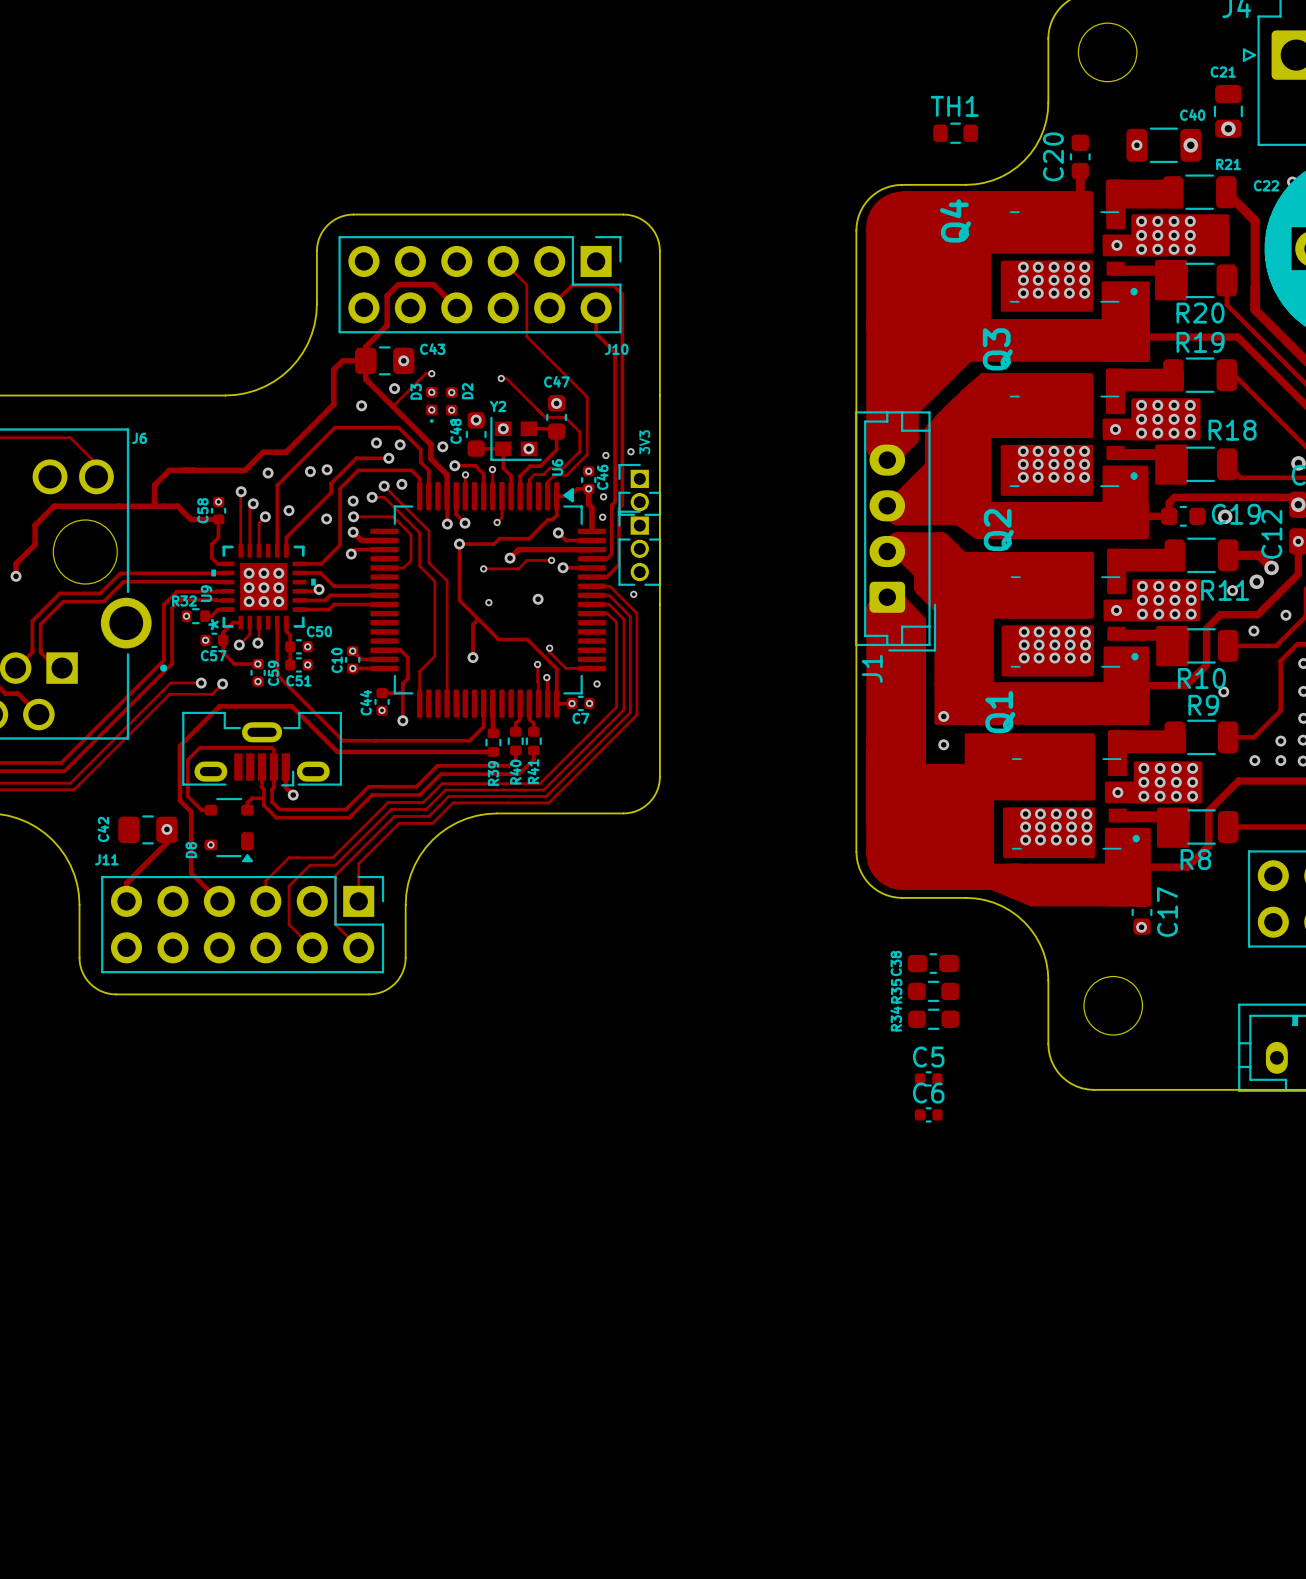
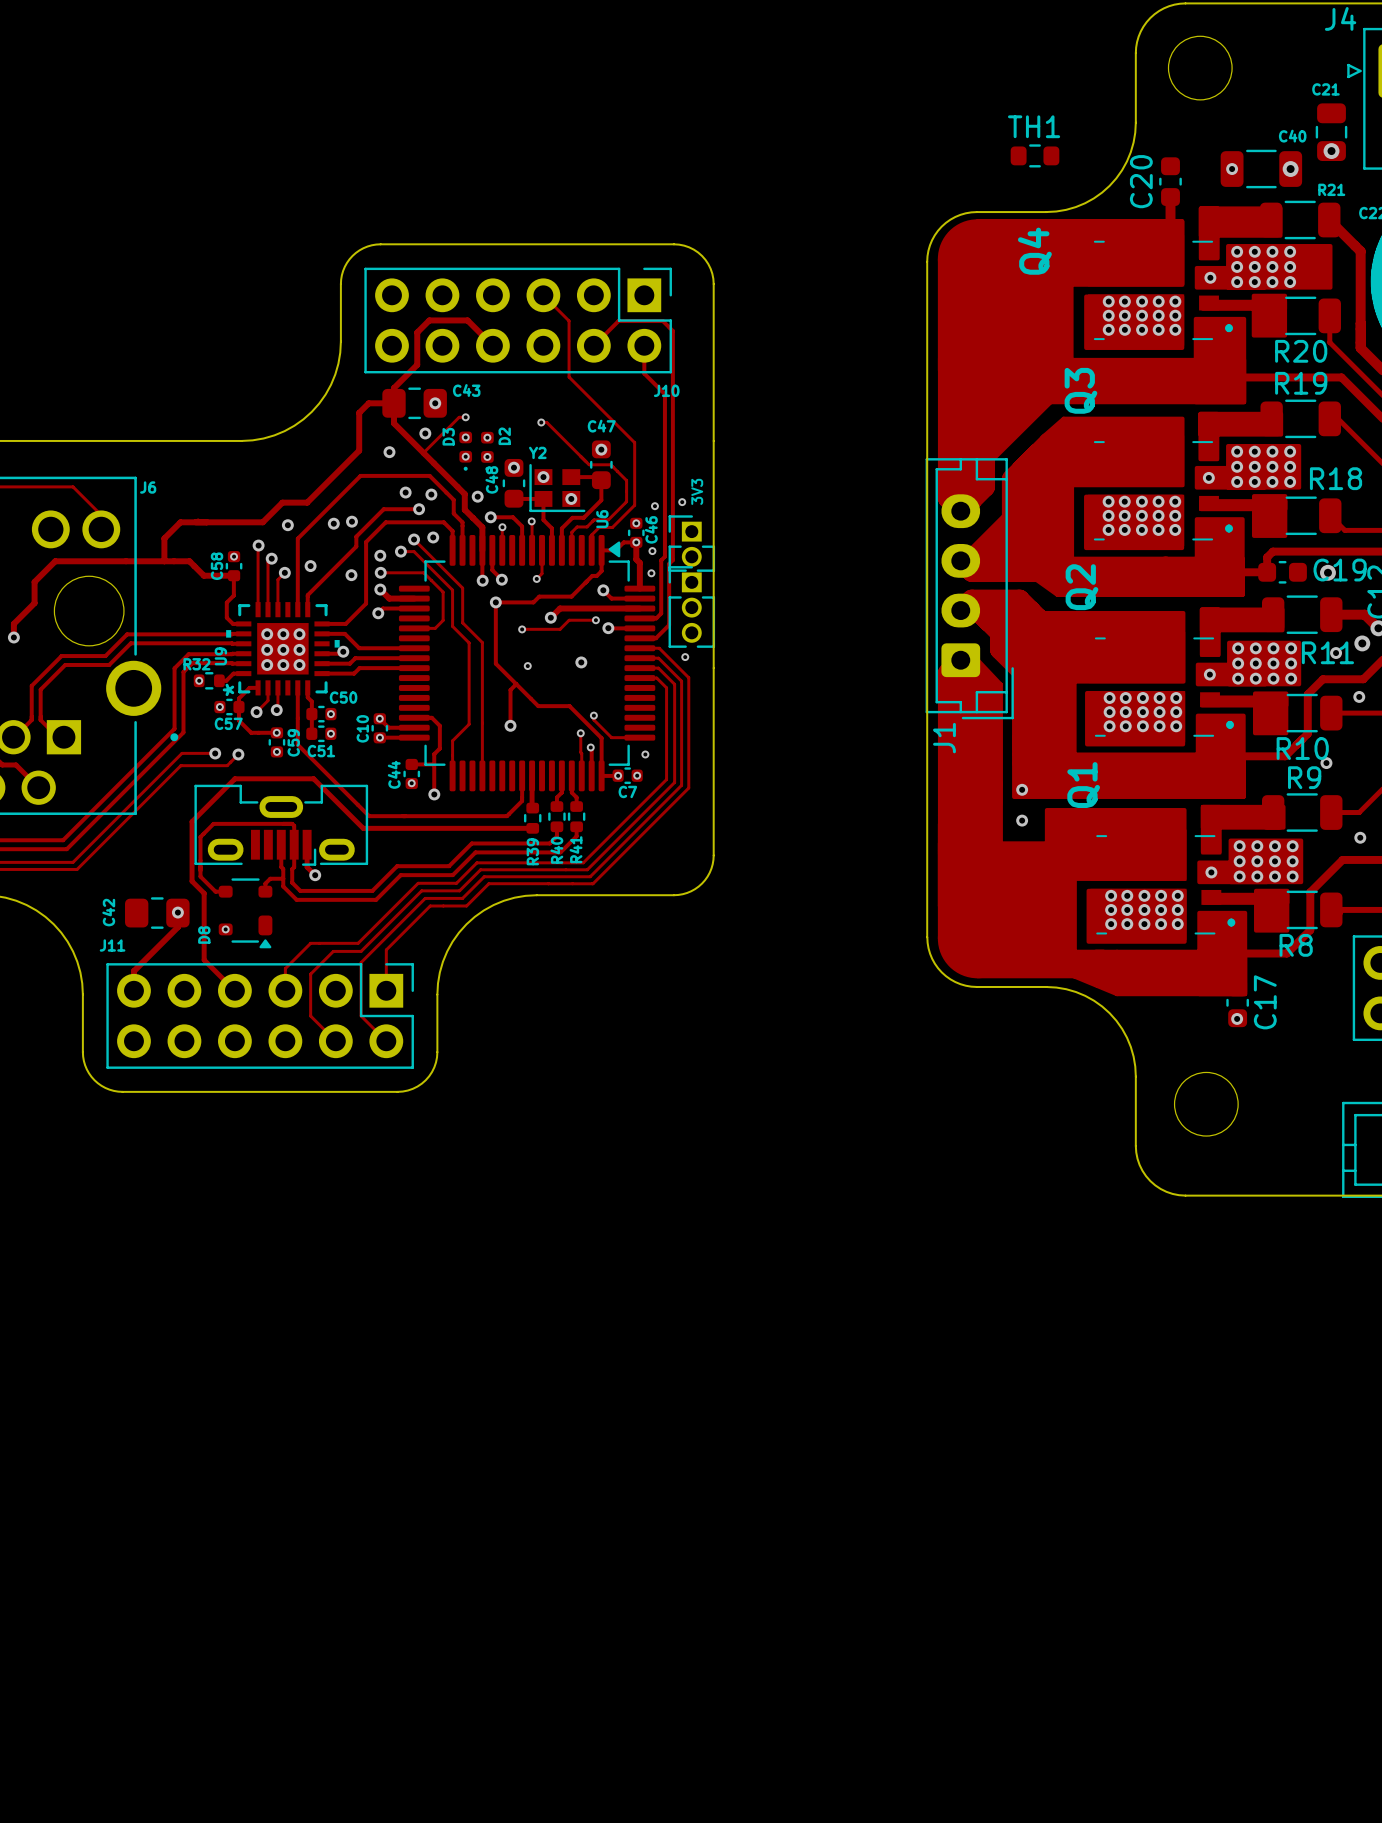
C38: (933, 963) -> none
R35: (933, 991) -> none
R34: (933, 1019) -> none
C5: (928, 1078) -> none
C6: (928, 1114) -> none

